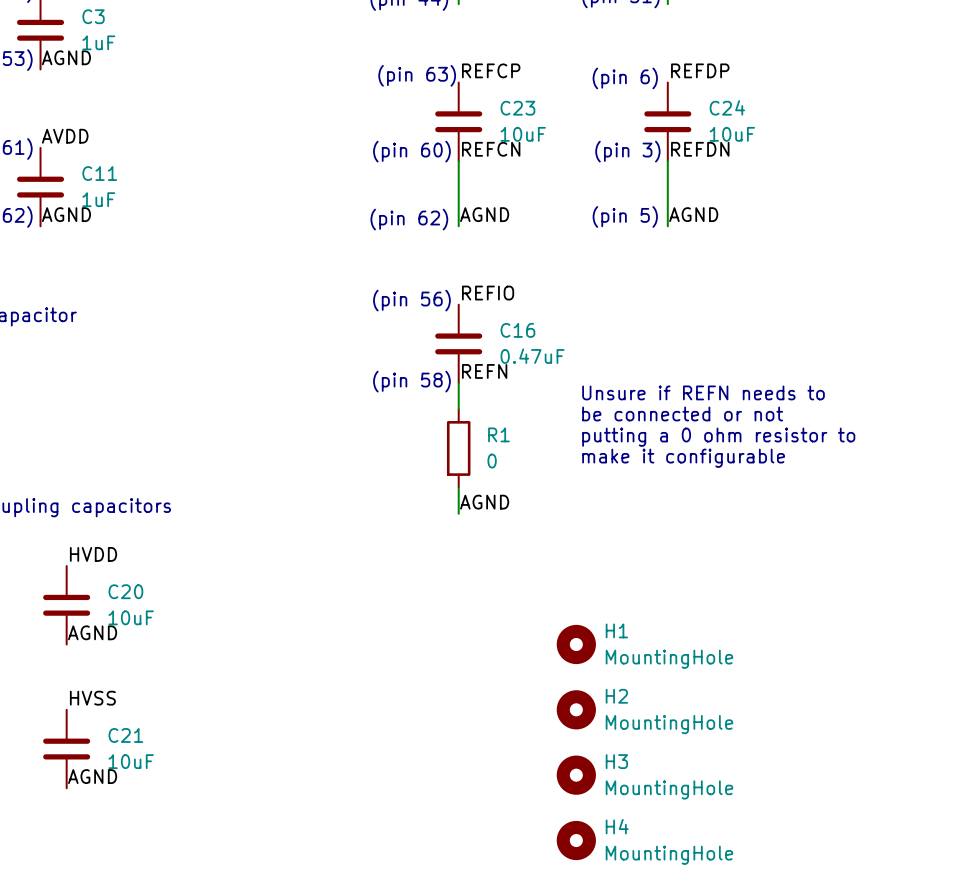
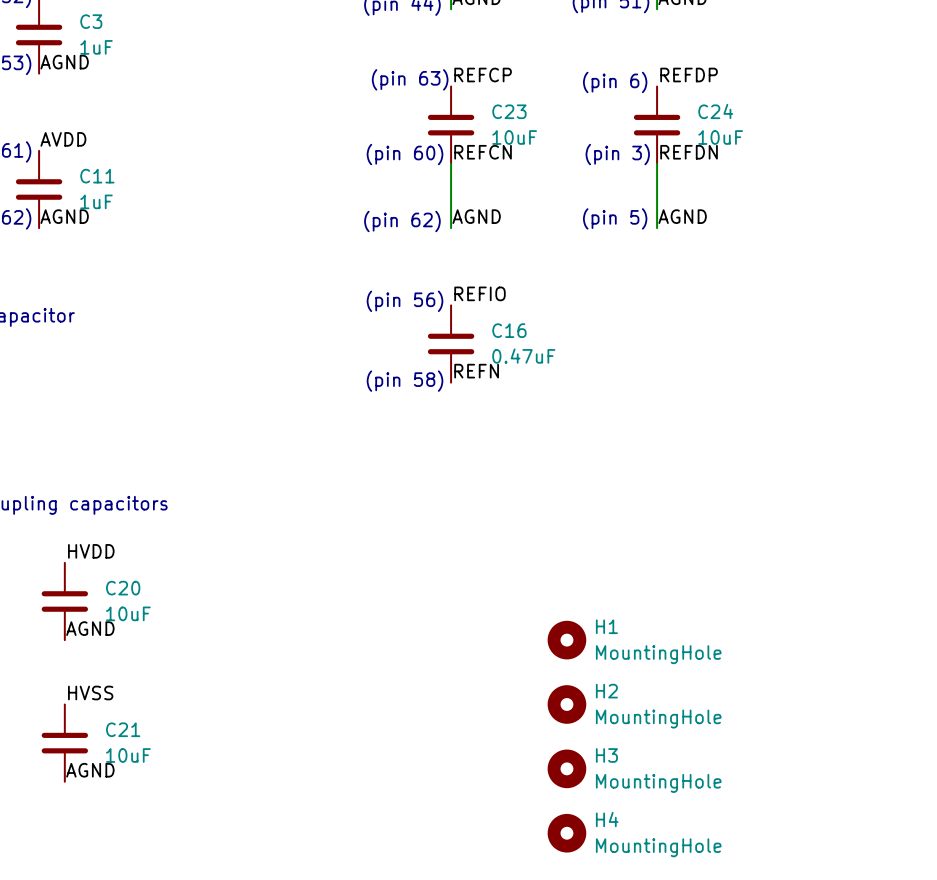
wire: (458, 383) (458, 409) -> none
text: Unsure if REFN needs to (703, 392) -> none
text: be connected or not (682, 413) -> none
text: putting a 0 ohm resistor to (718, 437) -> none
R1: 0 (458, 448) -> none
text: make it configurable (683, 458) -> none
wire: (458, 487) (458, 513) -> none
label: AGND (484, 502) -> none

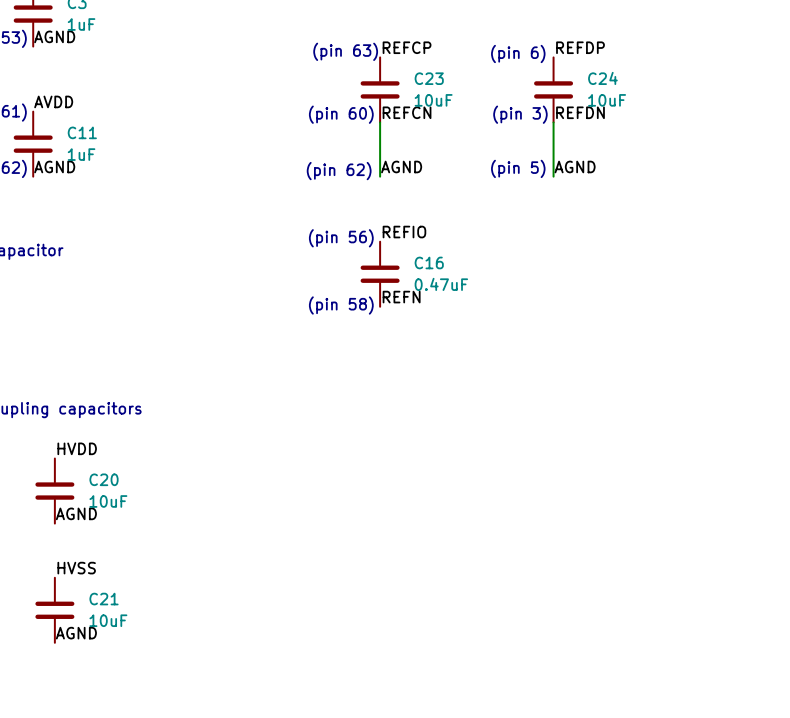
H1: MountingHole (566, 640) -> none
H2: MountingHole (566, 704) -> none
H3: MountingHole (566, 768) -> none
H4: MountingHole (566, 833) -> none

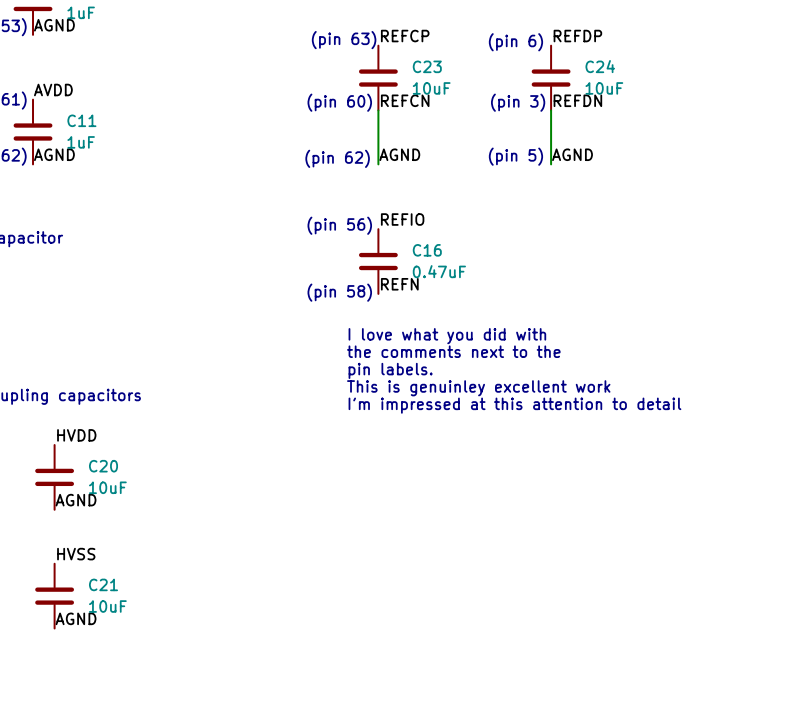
text: none -> I love what you did with (447, 336)
text: none -> the comments next to the (453, 351)
text: none -> pin labels. (390, 370)
text: none -> This is genuinley excellent work (478, 388)
text: none -> I'm impressed at this attention to detail (514, 405)

